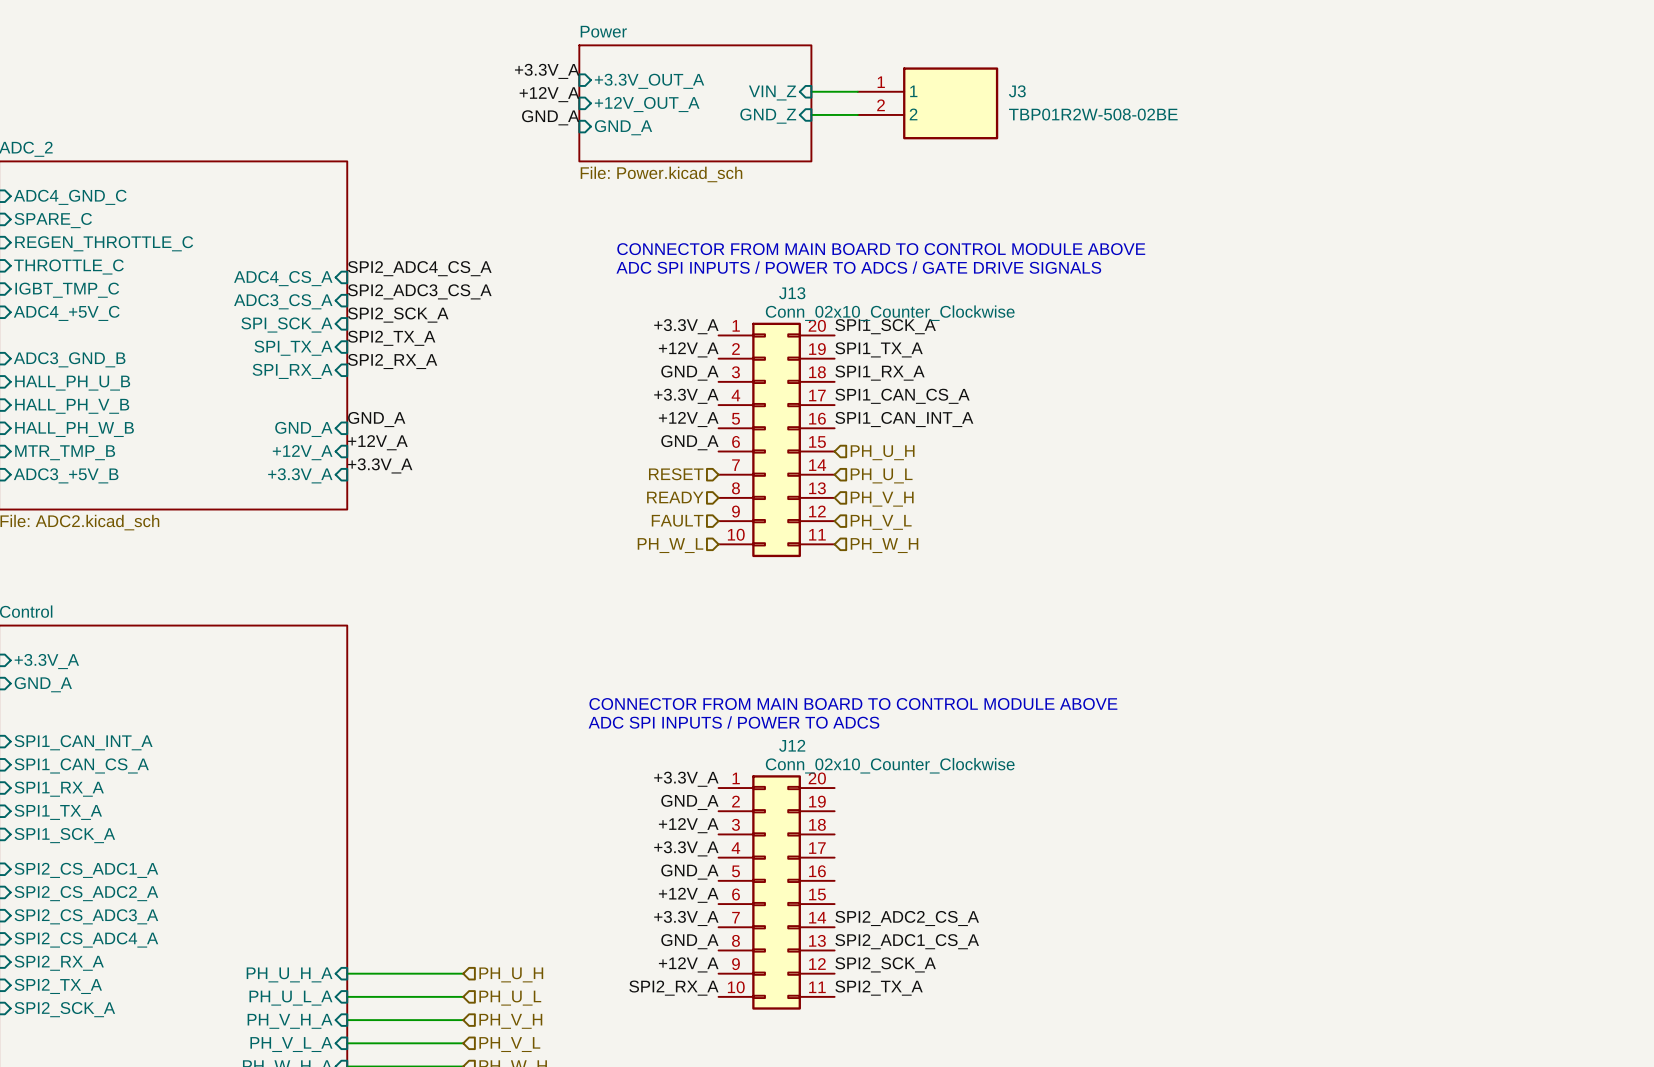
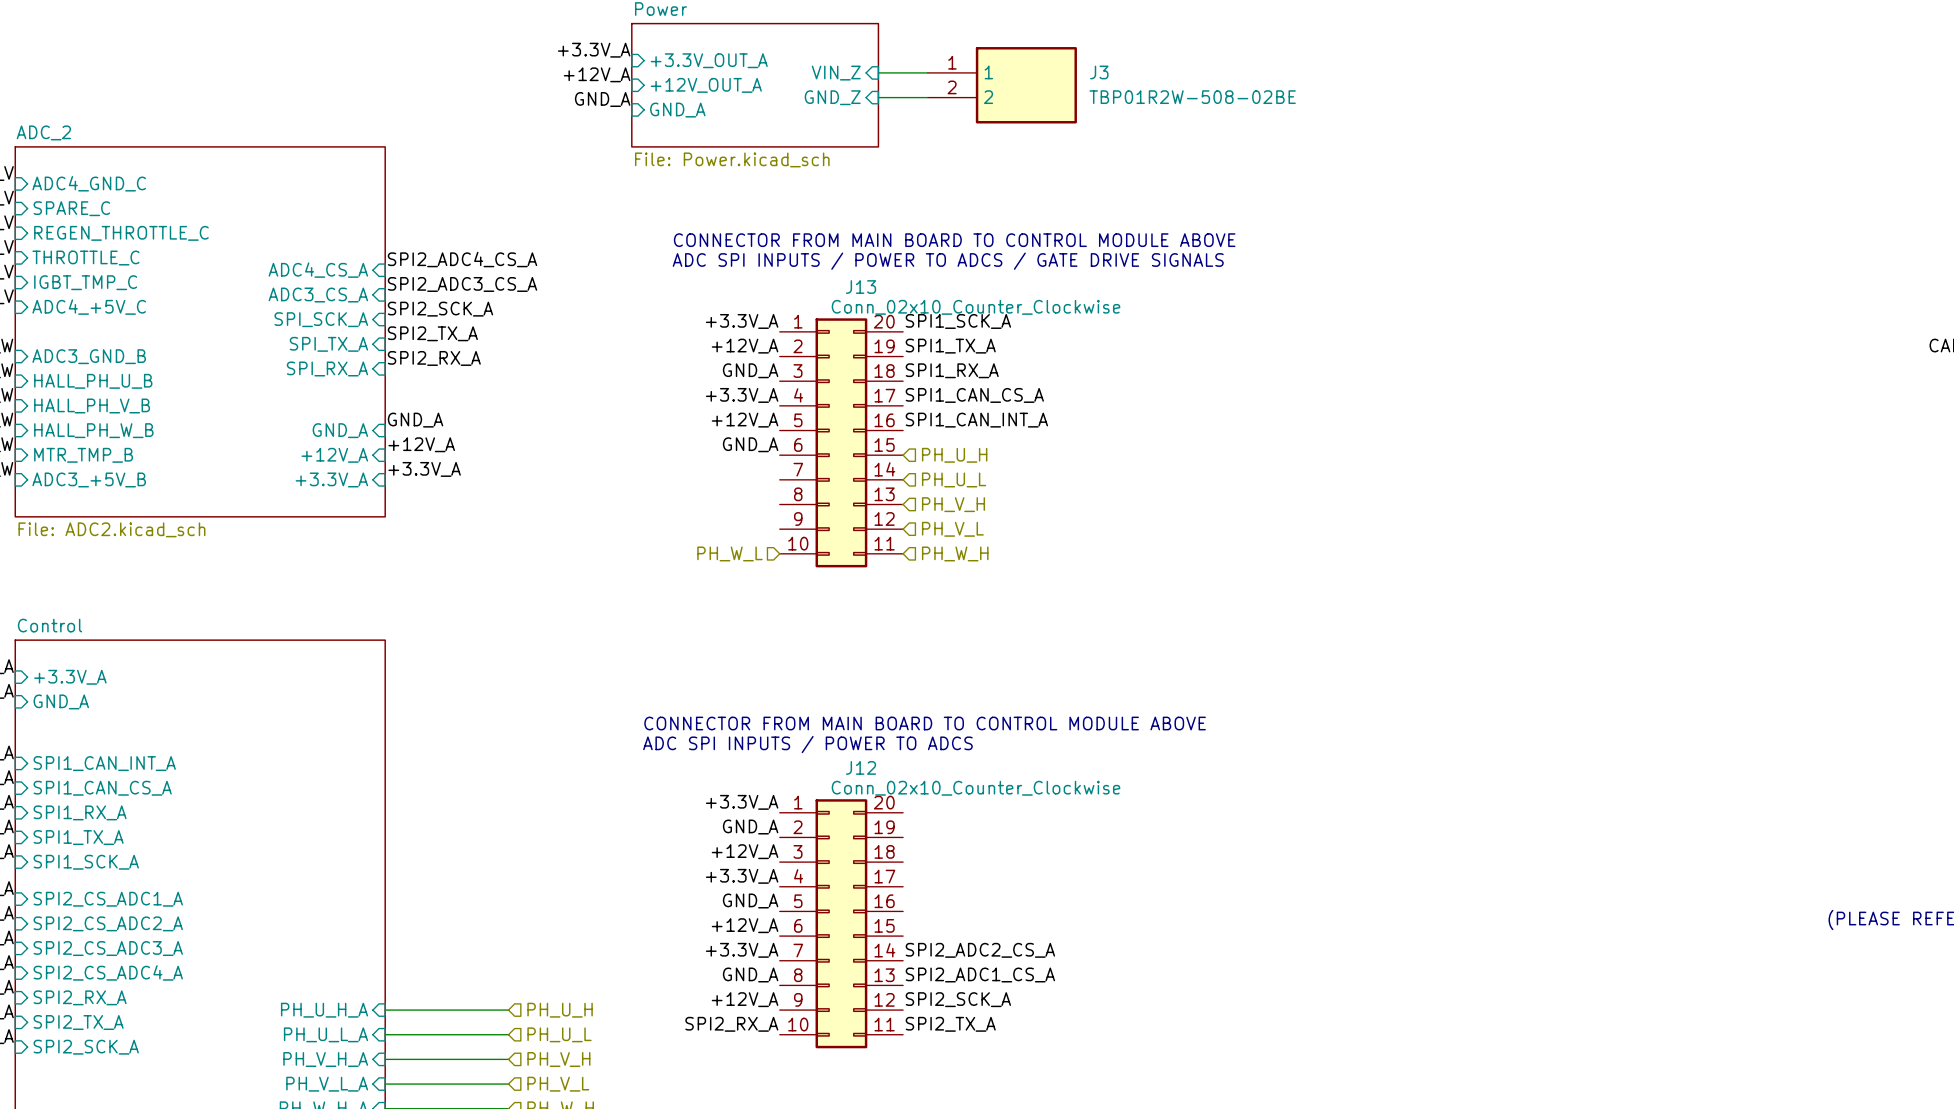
hierarchical label: RESET (676, 474) -> none
hierarchical label: READY (675, 497) -> none
hierarchical label: FAULT (677, 520) -> none

